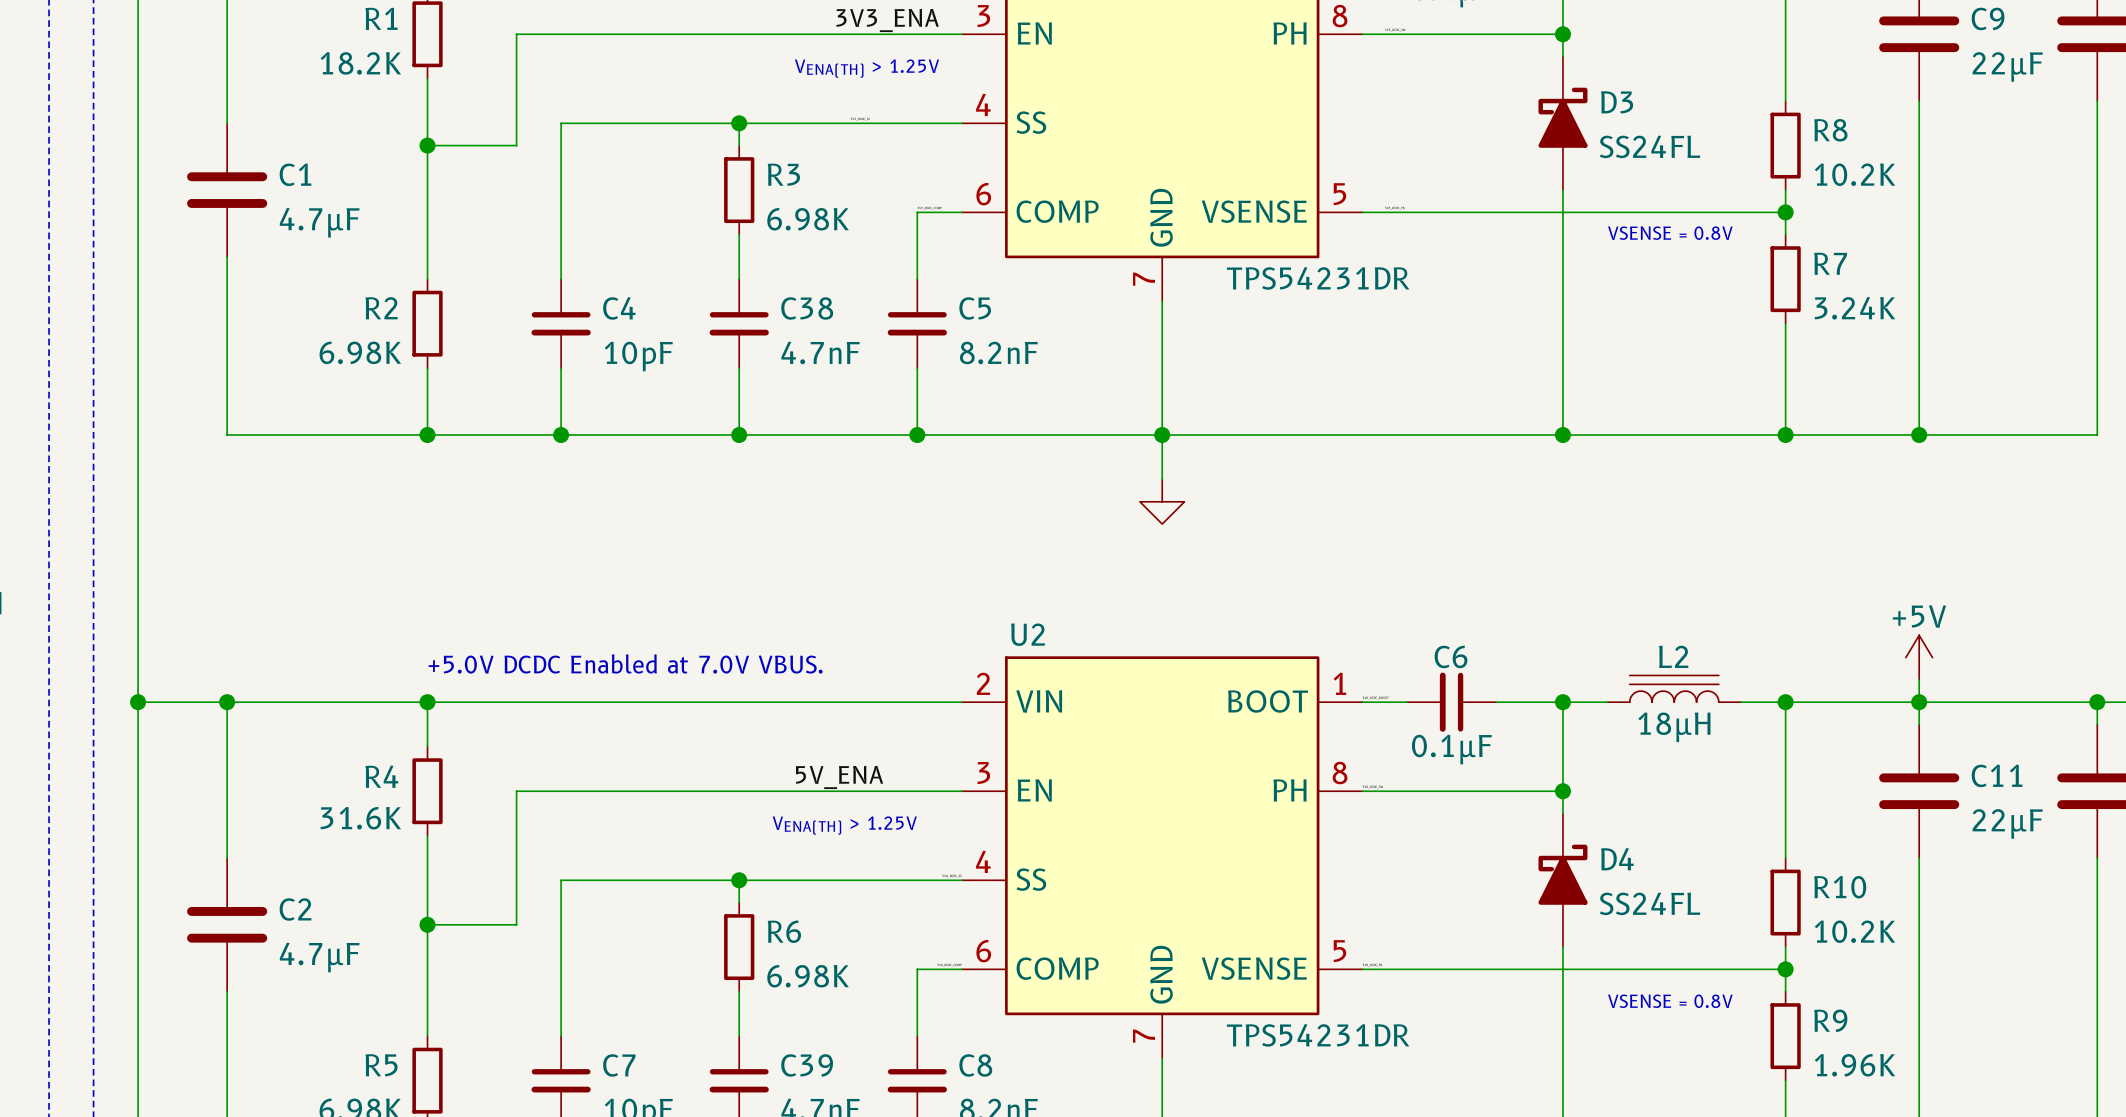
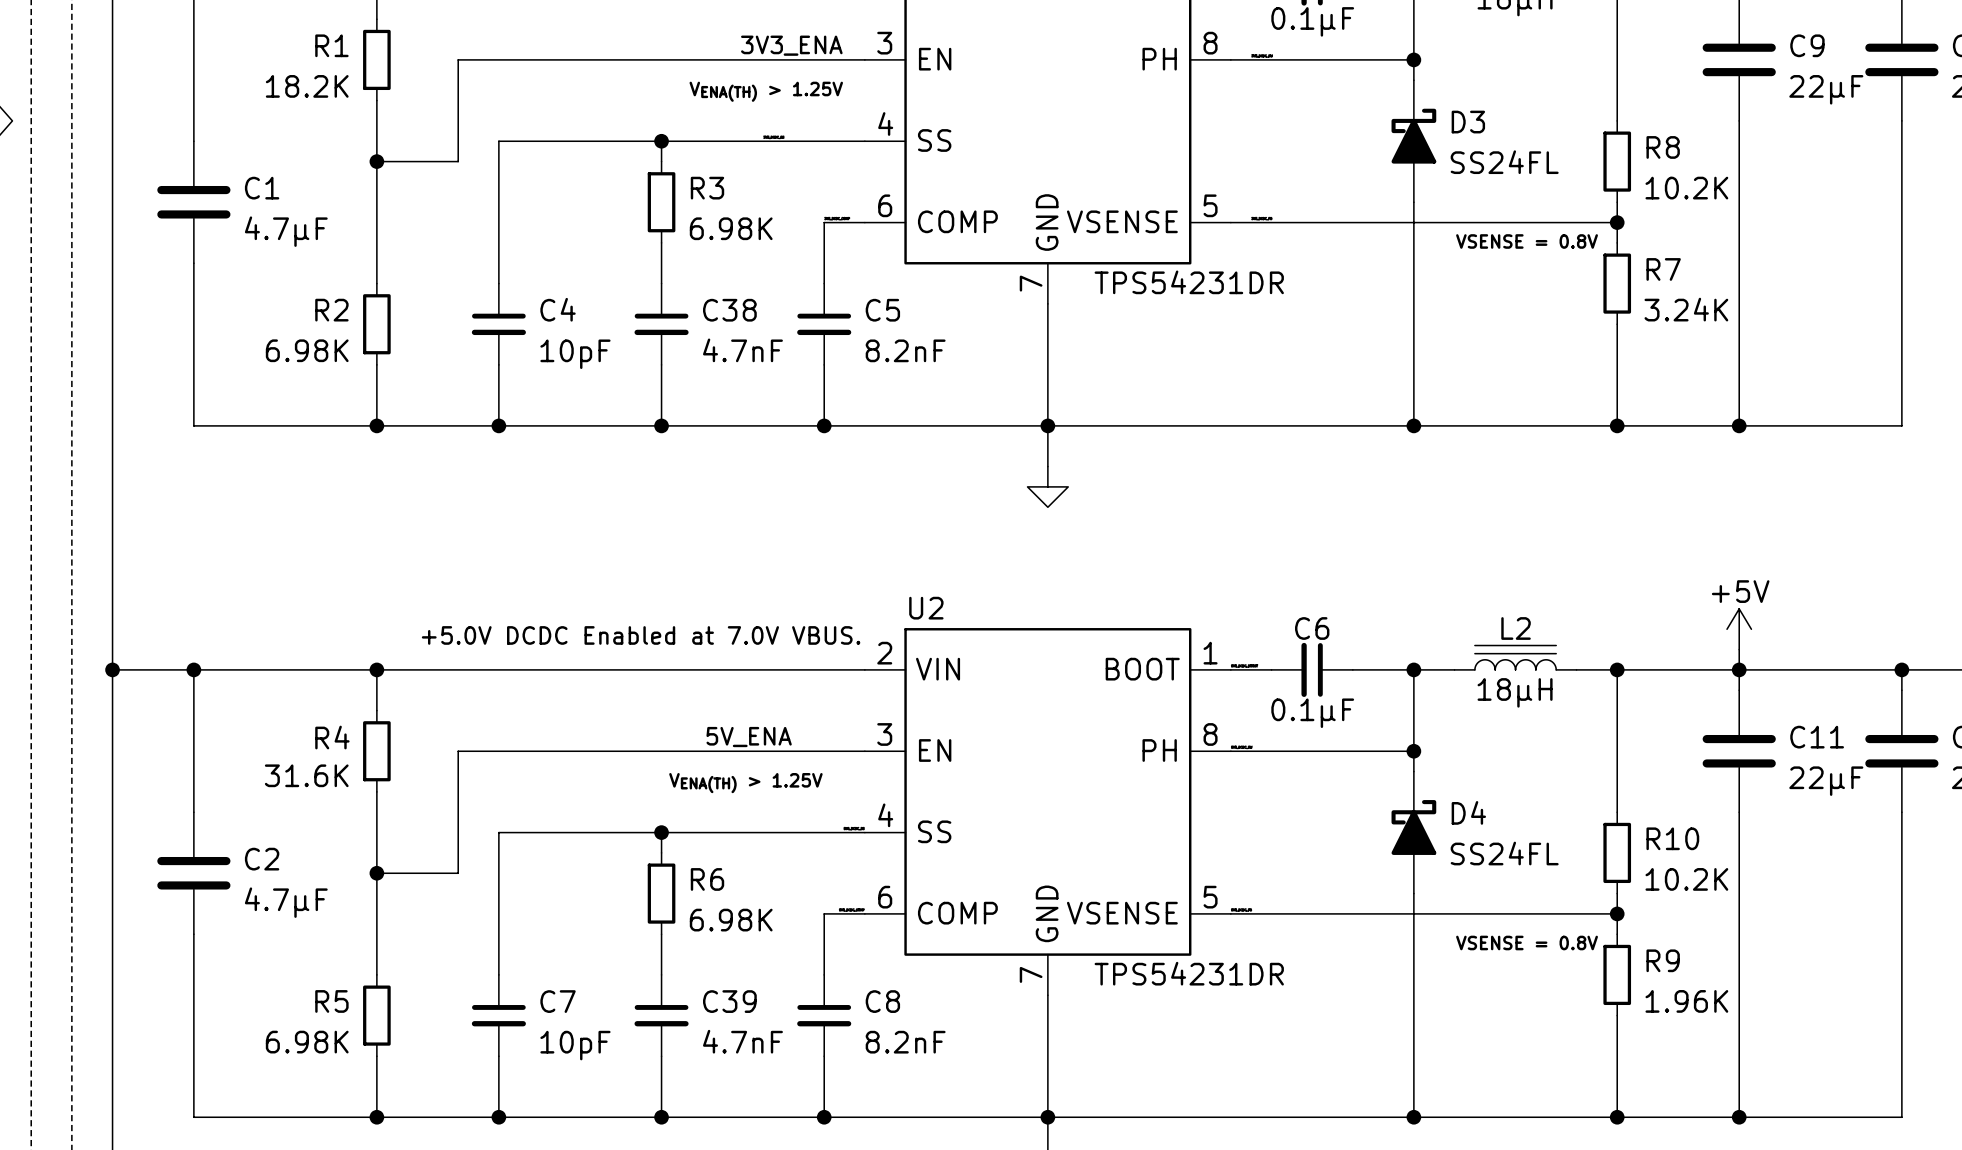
text position: +5.0V DCDC Enabled at 7.0V VBUS. (625, 663) -> +5.0V DCDC Enabled at 7.0V VBUS. (641, 635)

